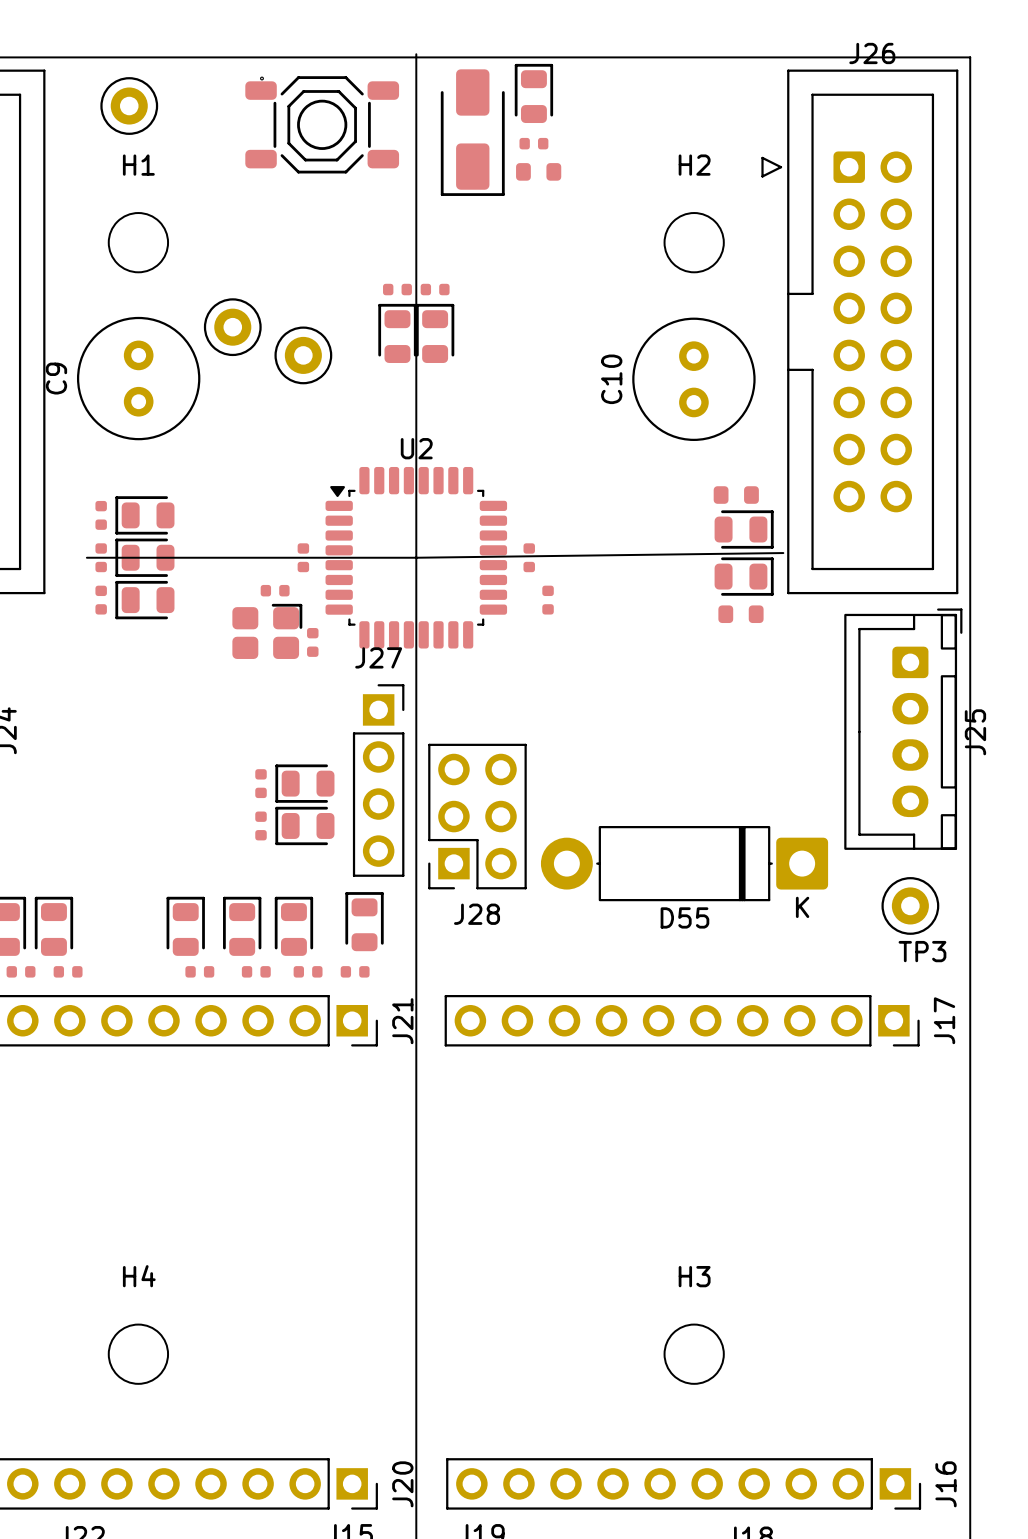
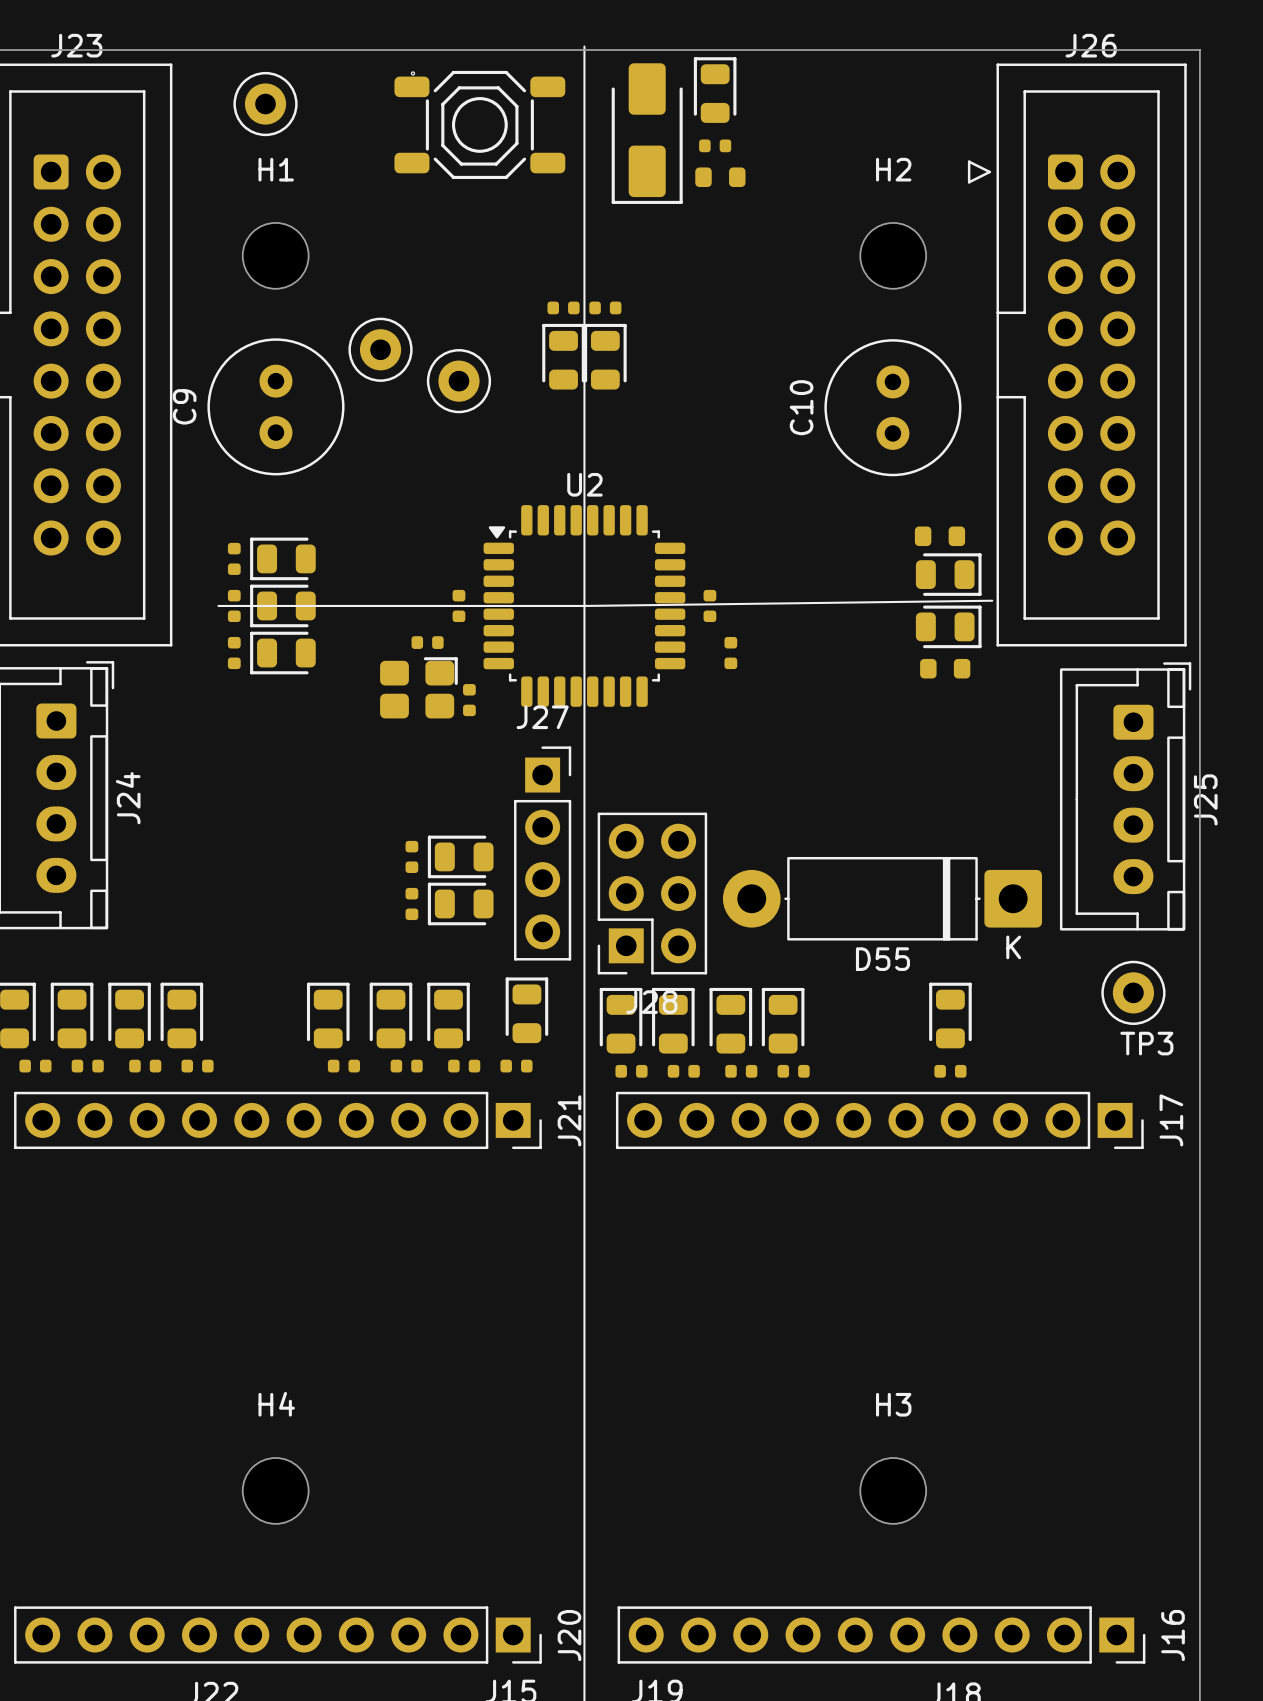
D55 position: (684, 863) -> (882, 898)
part: none -> (950, 1015)
part: none -> (621, 1020)
part: none -> (673, 1020)
part: none -> (730, 1020)
part: none -> (783, 1020)
part: none -> (631, 1071)
part: none -> (683, 1071)
part: none -> (741, 1071)
part: none -> (793, 1071)
part: none -> (950, 1071)

